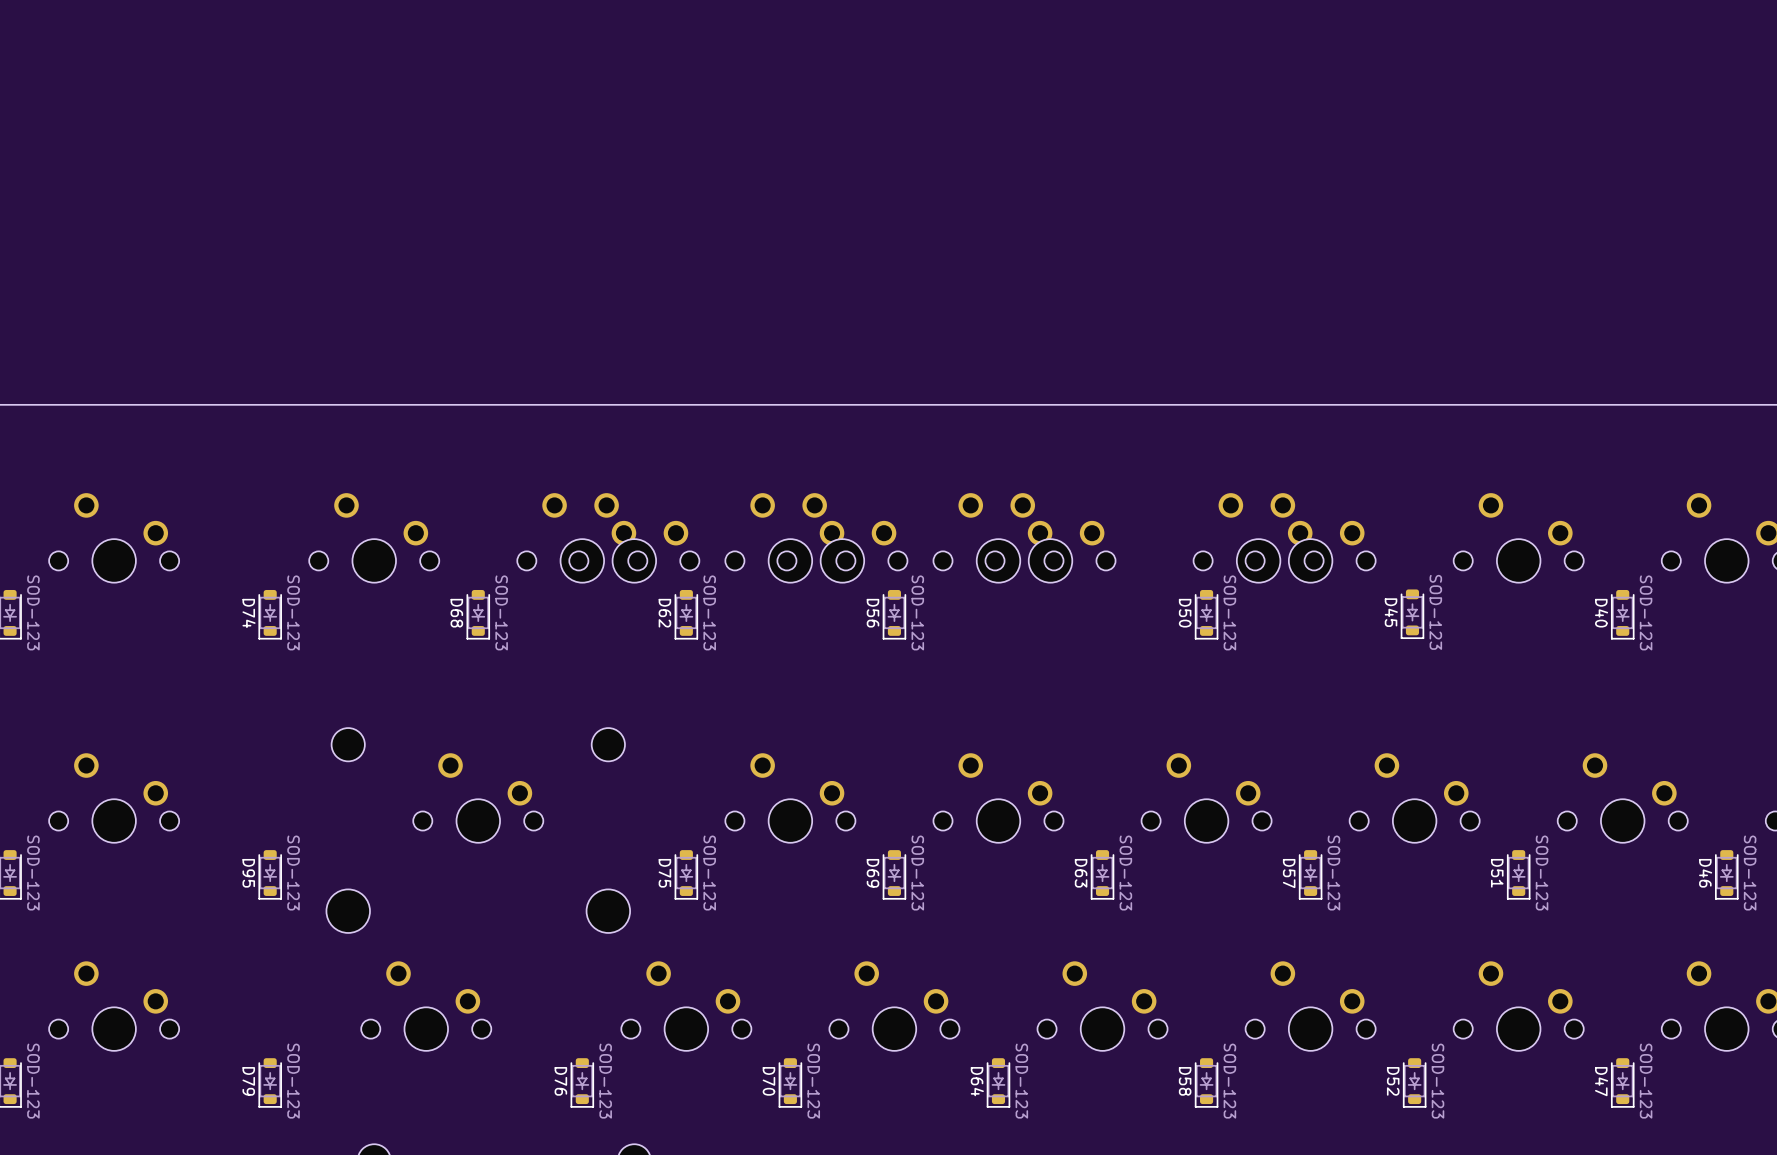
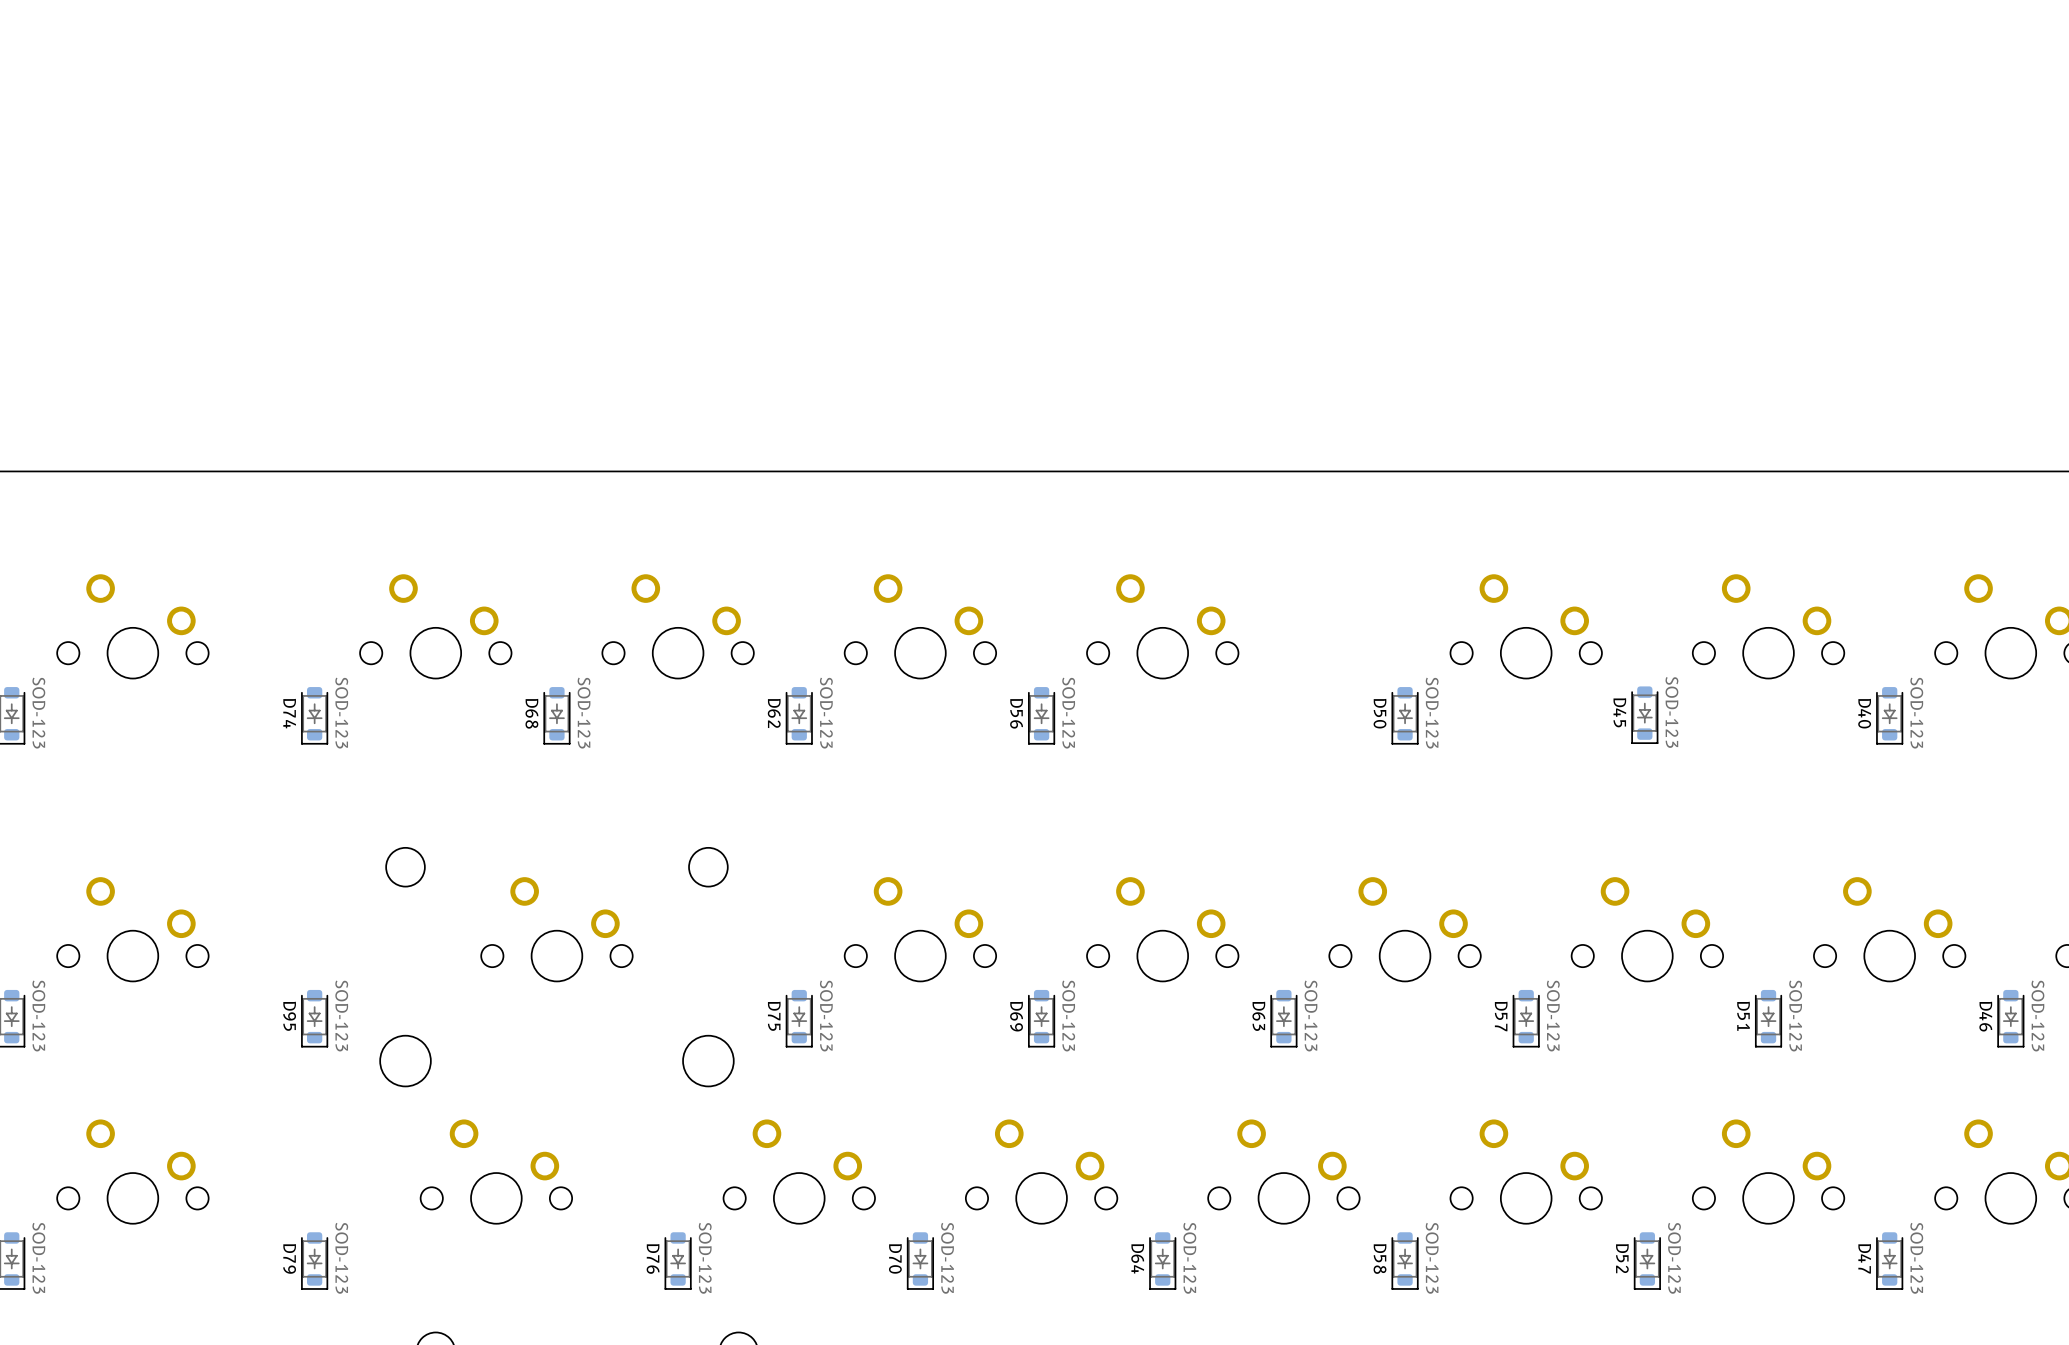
part: (634, 537) -> none
part: (842, 537) -> none
part: (1050, 537) -> none
part: (1258, 537) -> none

